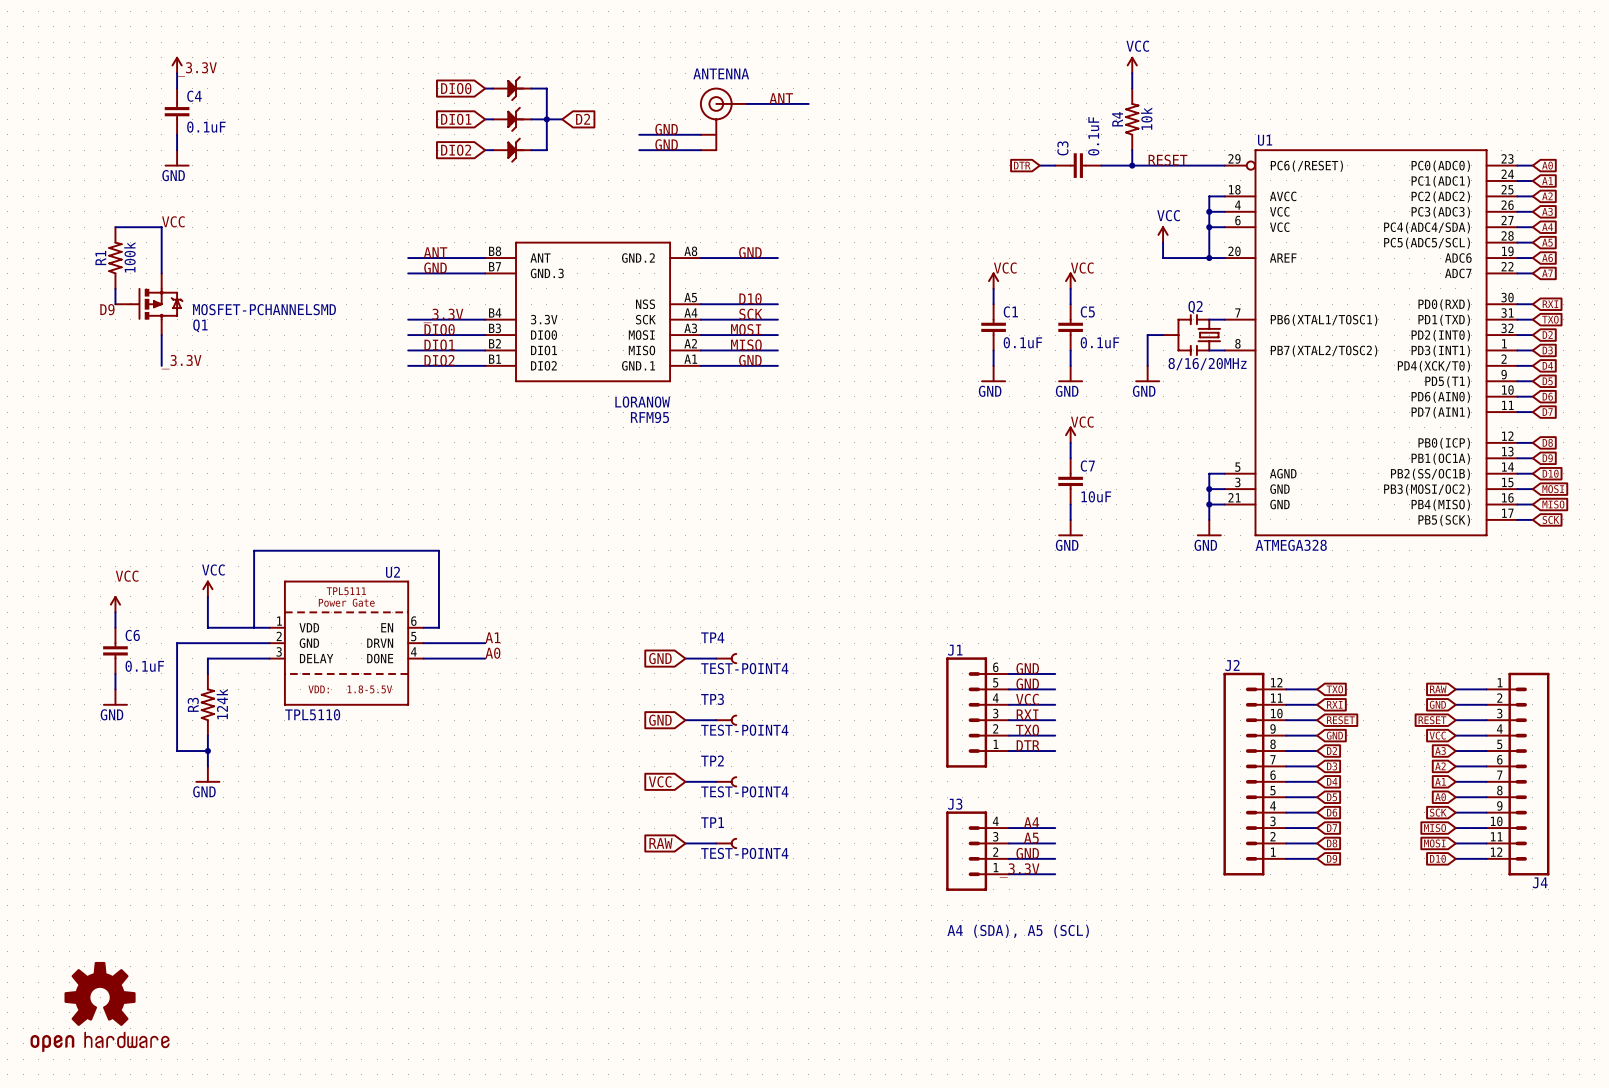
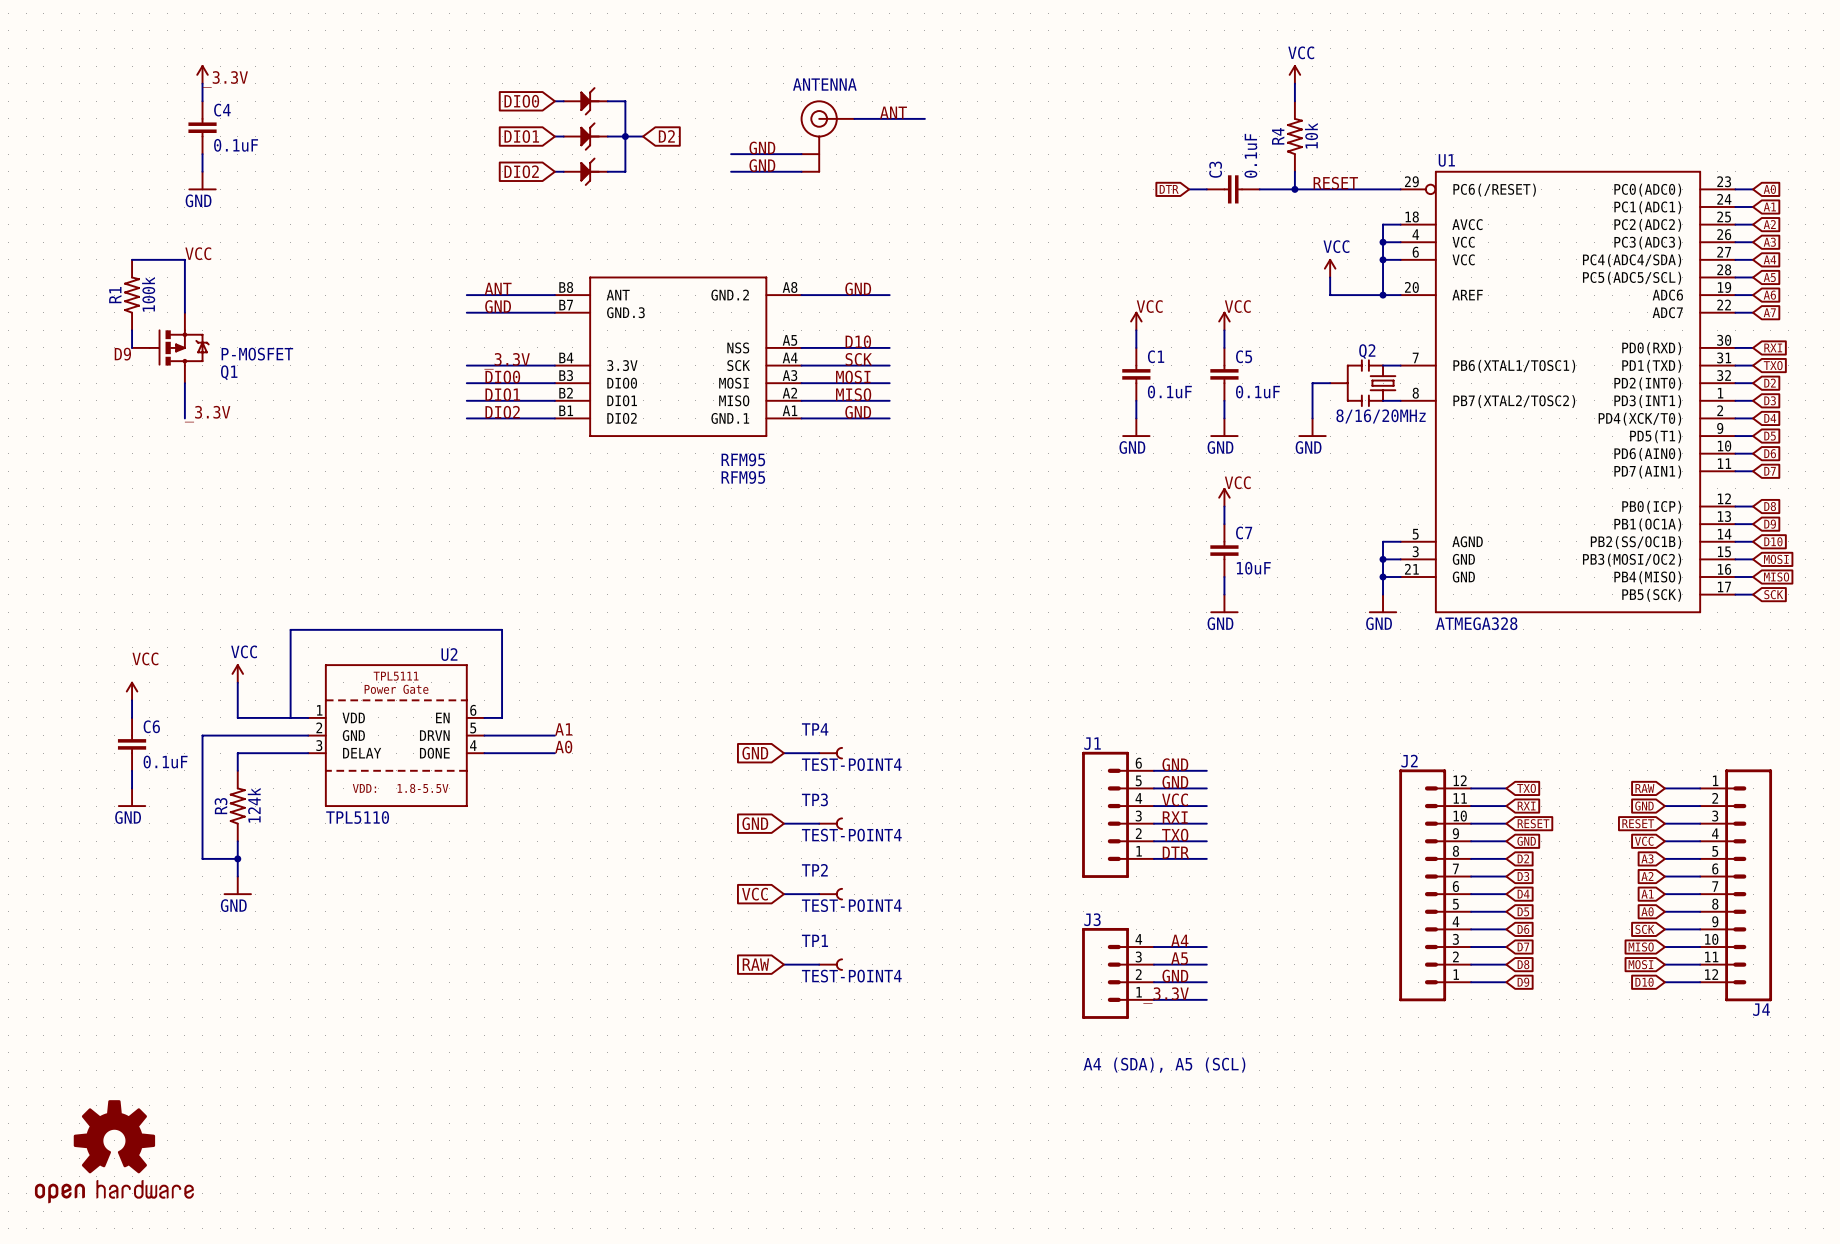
Q1 value: MOSFET-PCHANNELSMD (264, 309) -> P-MOSFET (257, 354)
RFM95 value: LORANOW (642, 402) -> RFM95 (743, 459)

